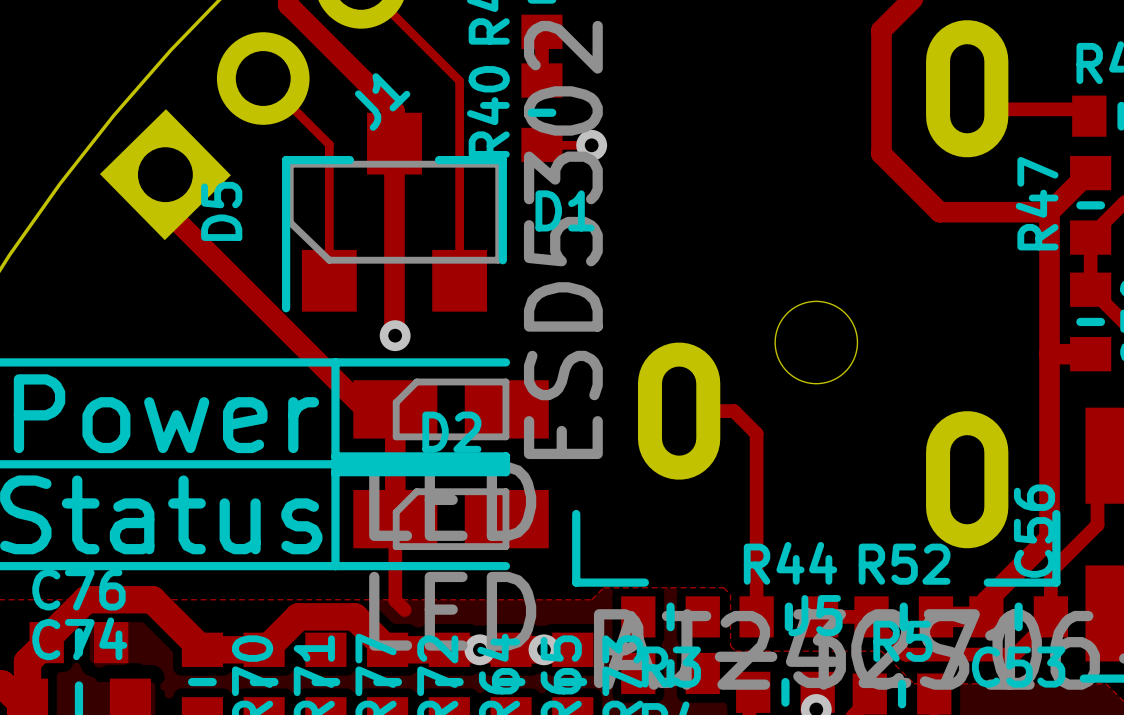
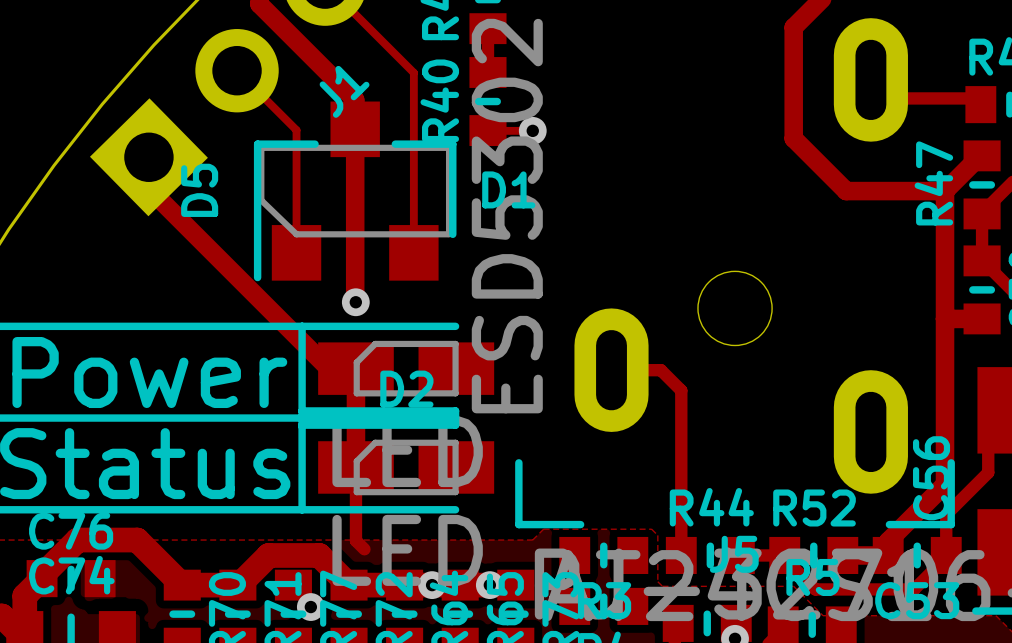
via: none -> (310, 607)

